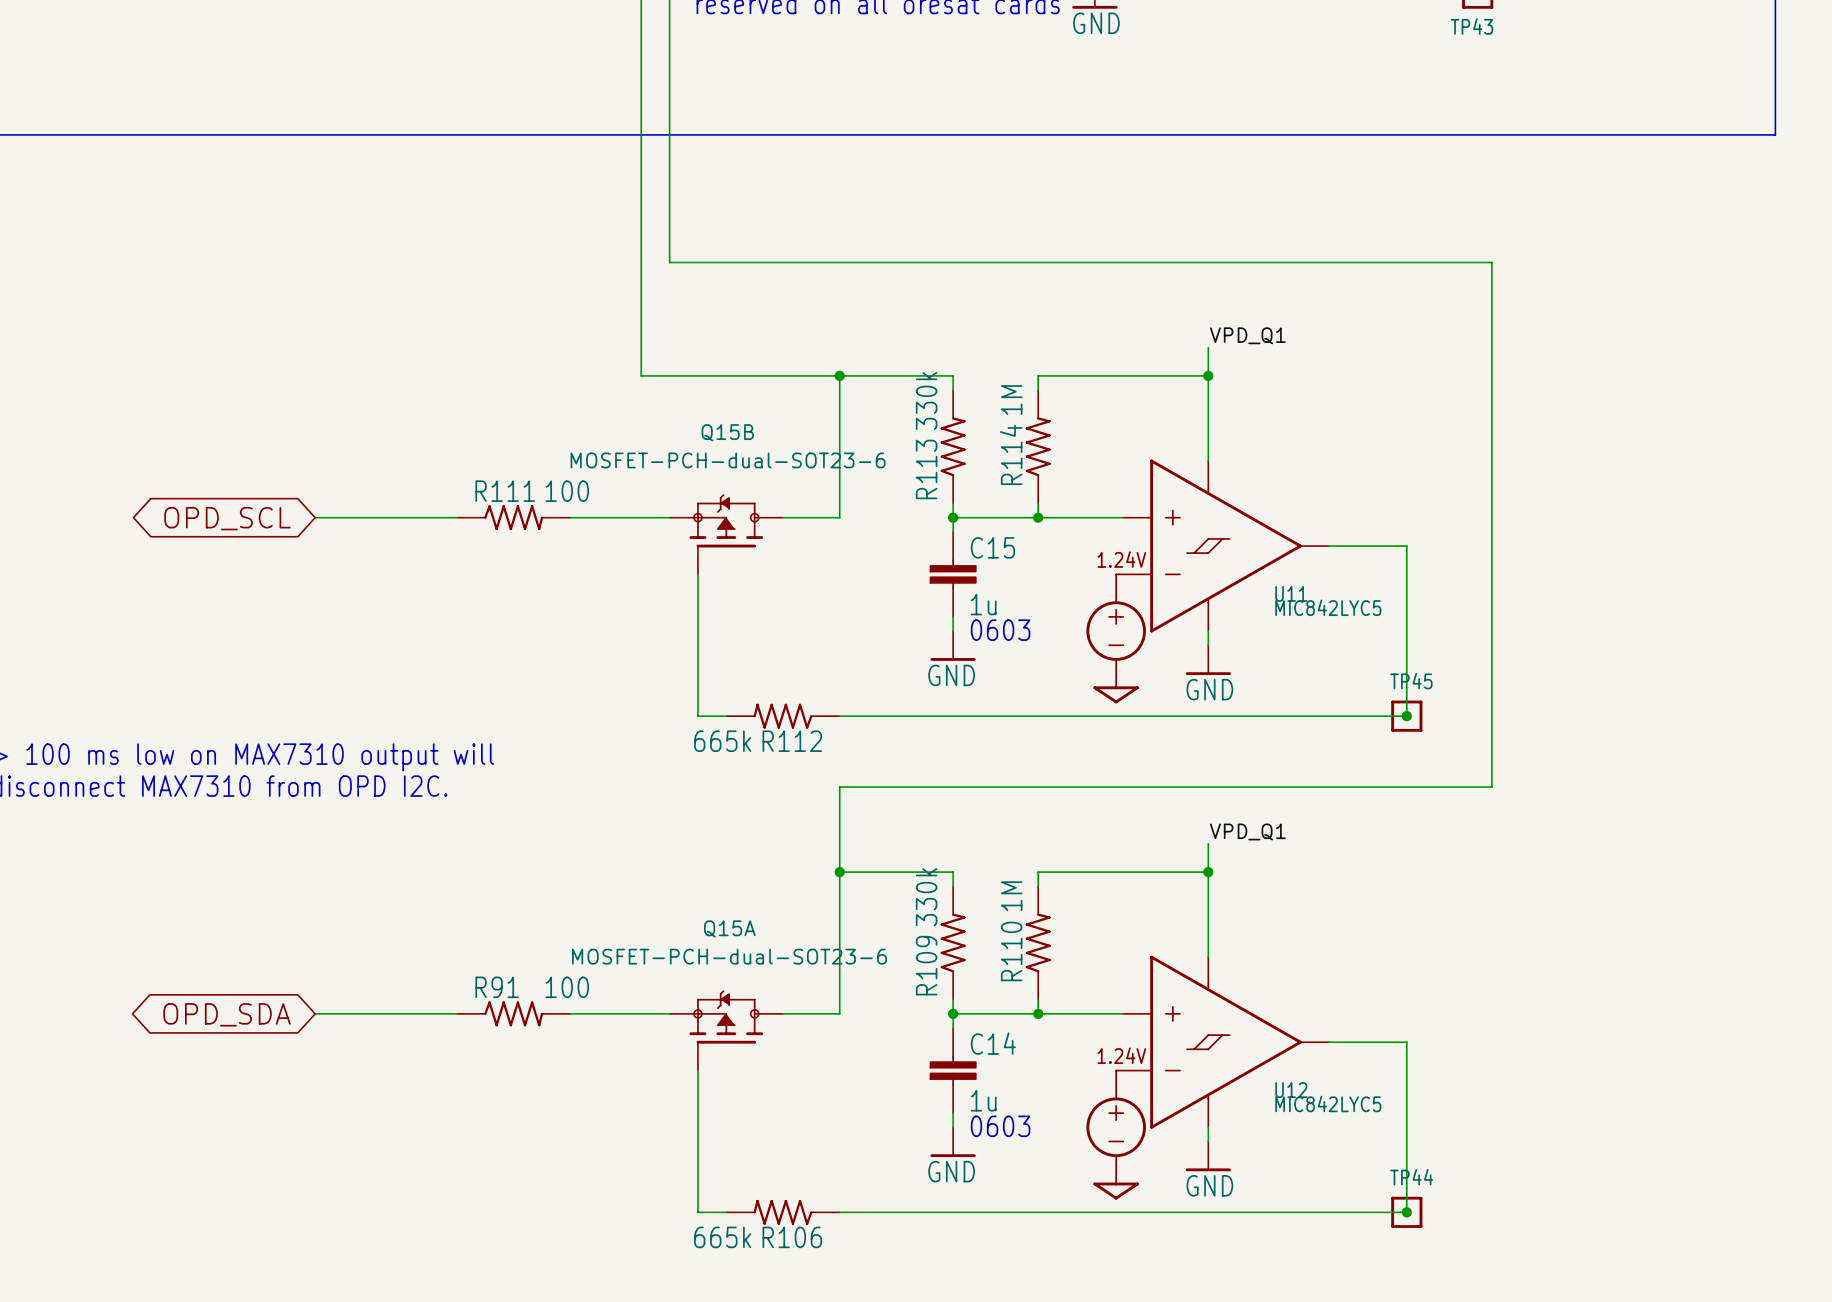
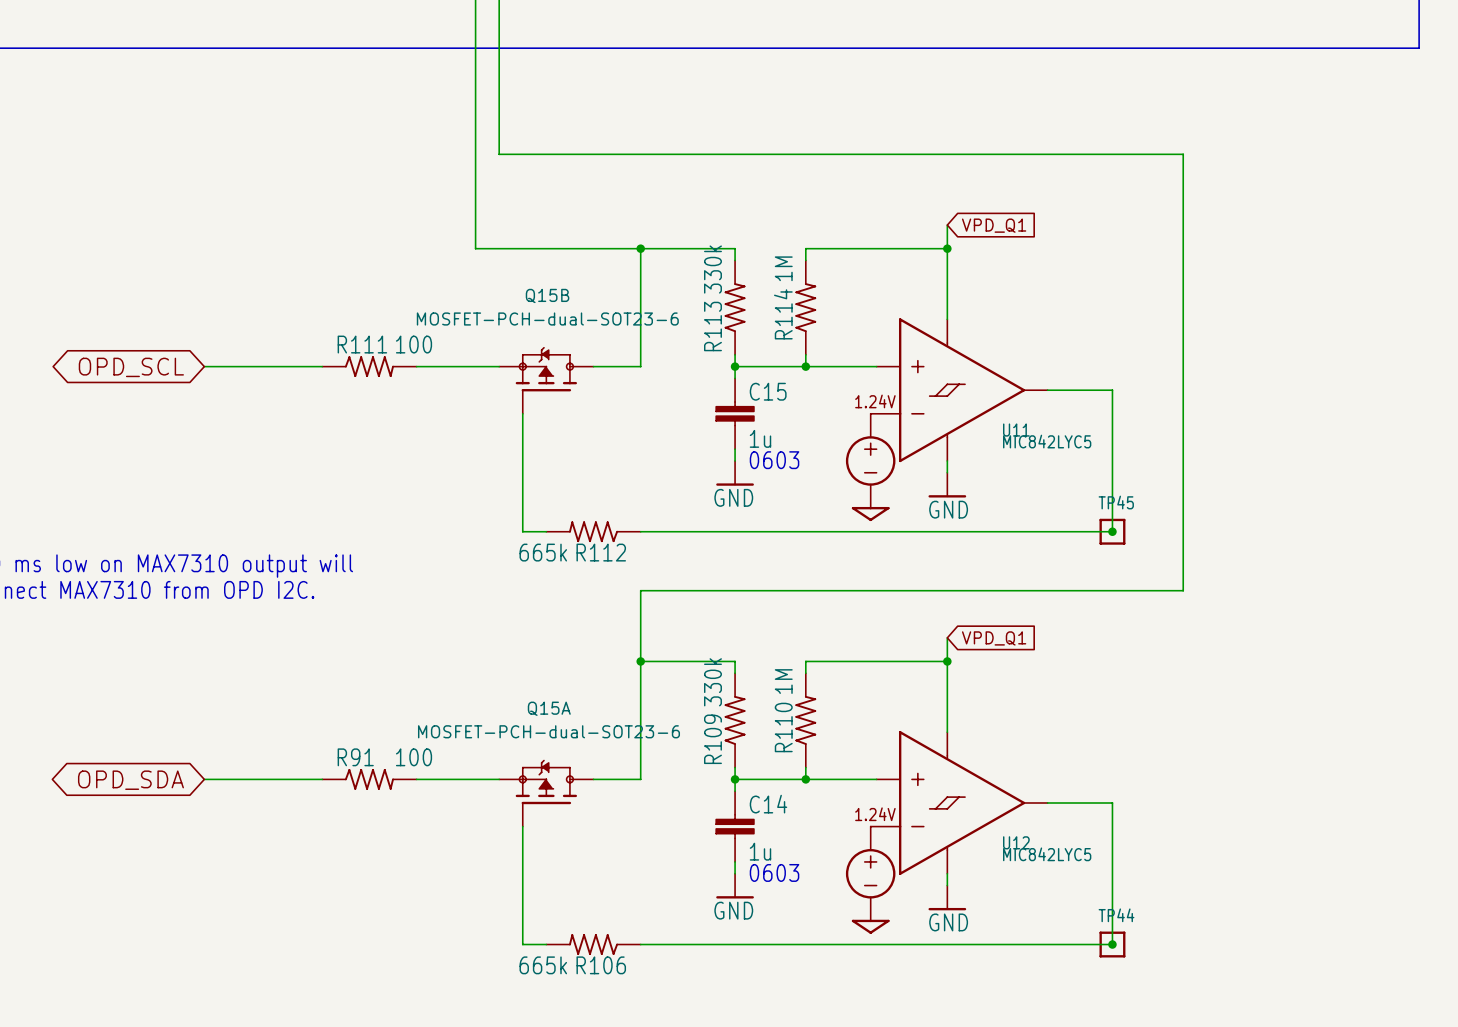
label: VPD_Q1 (1247, 335) -> none
global label: none -> VPD_Q1 (994, 225)
label: VPD_Q1 (1247, 831) -> none
global label: none -> VPD_Q1 (994, 638)

